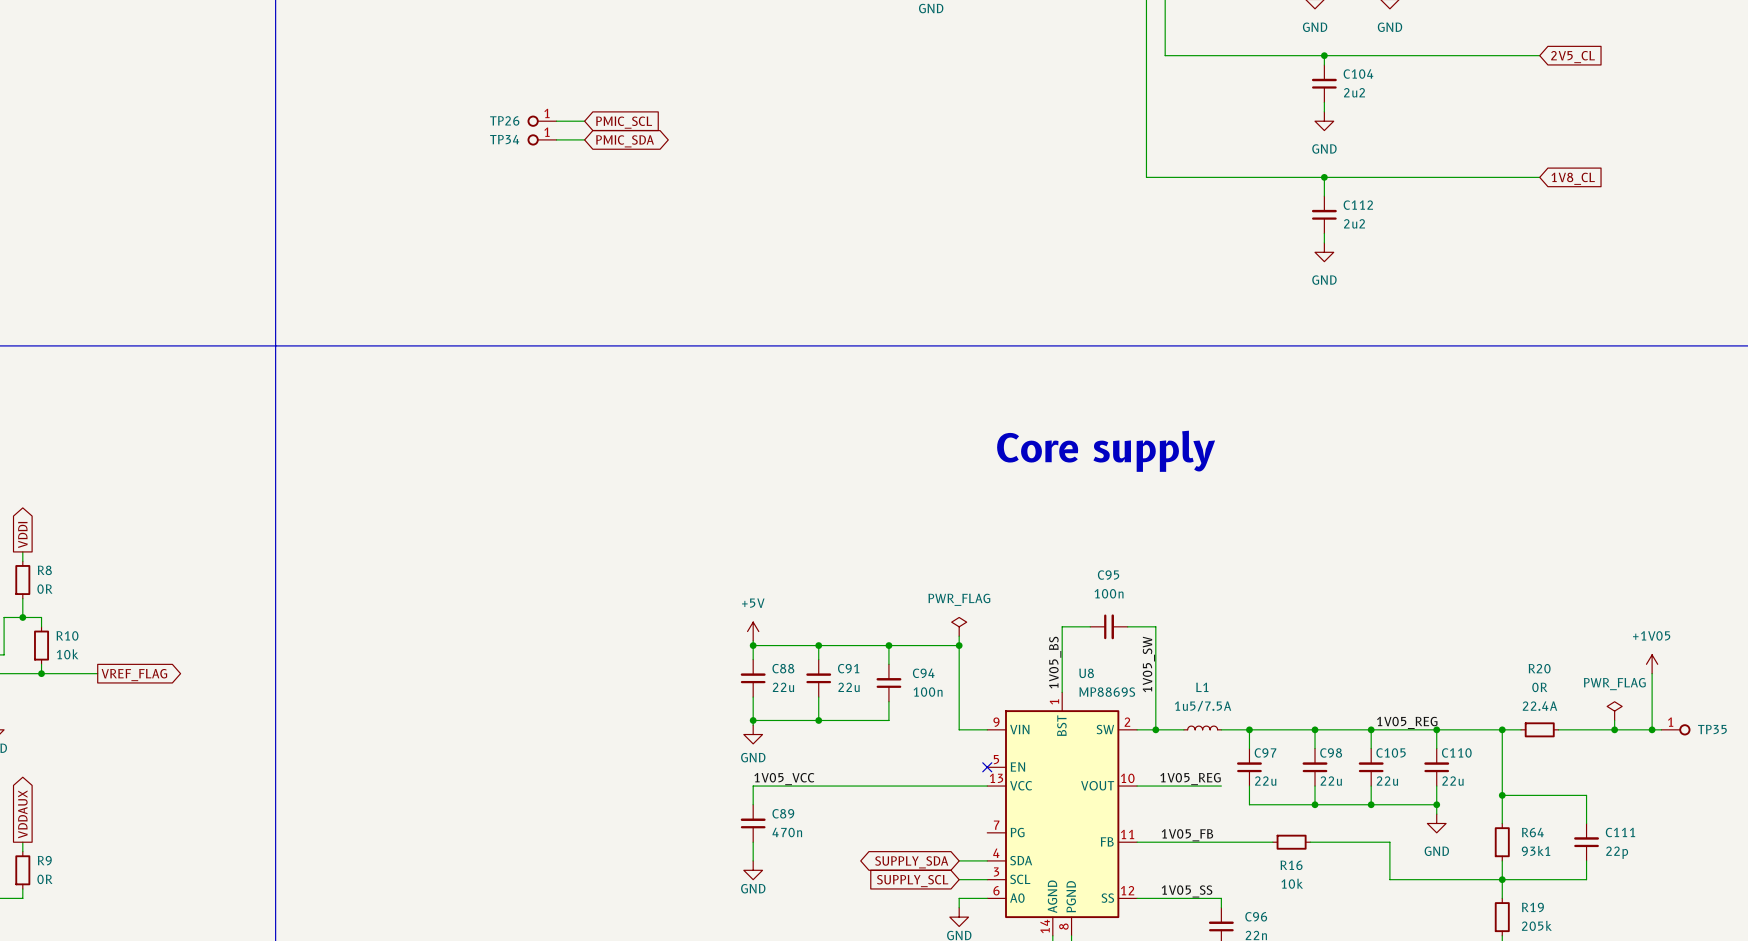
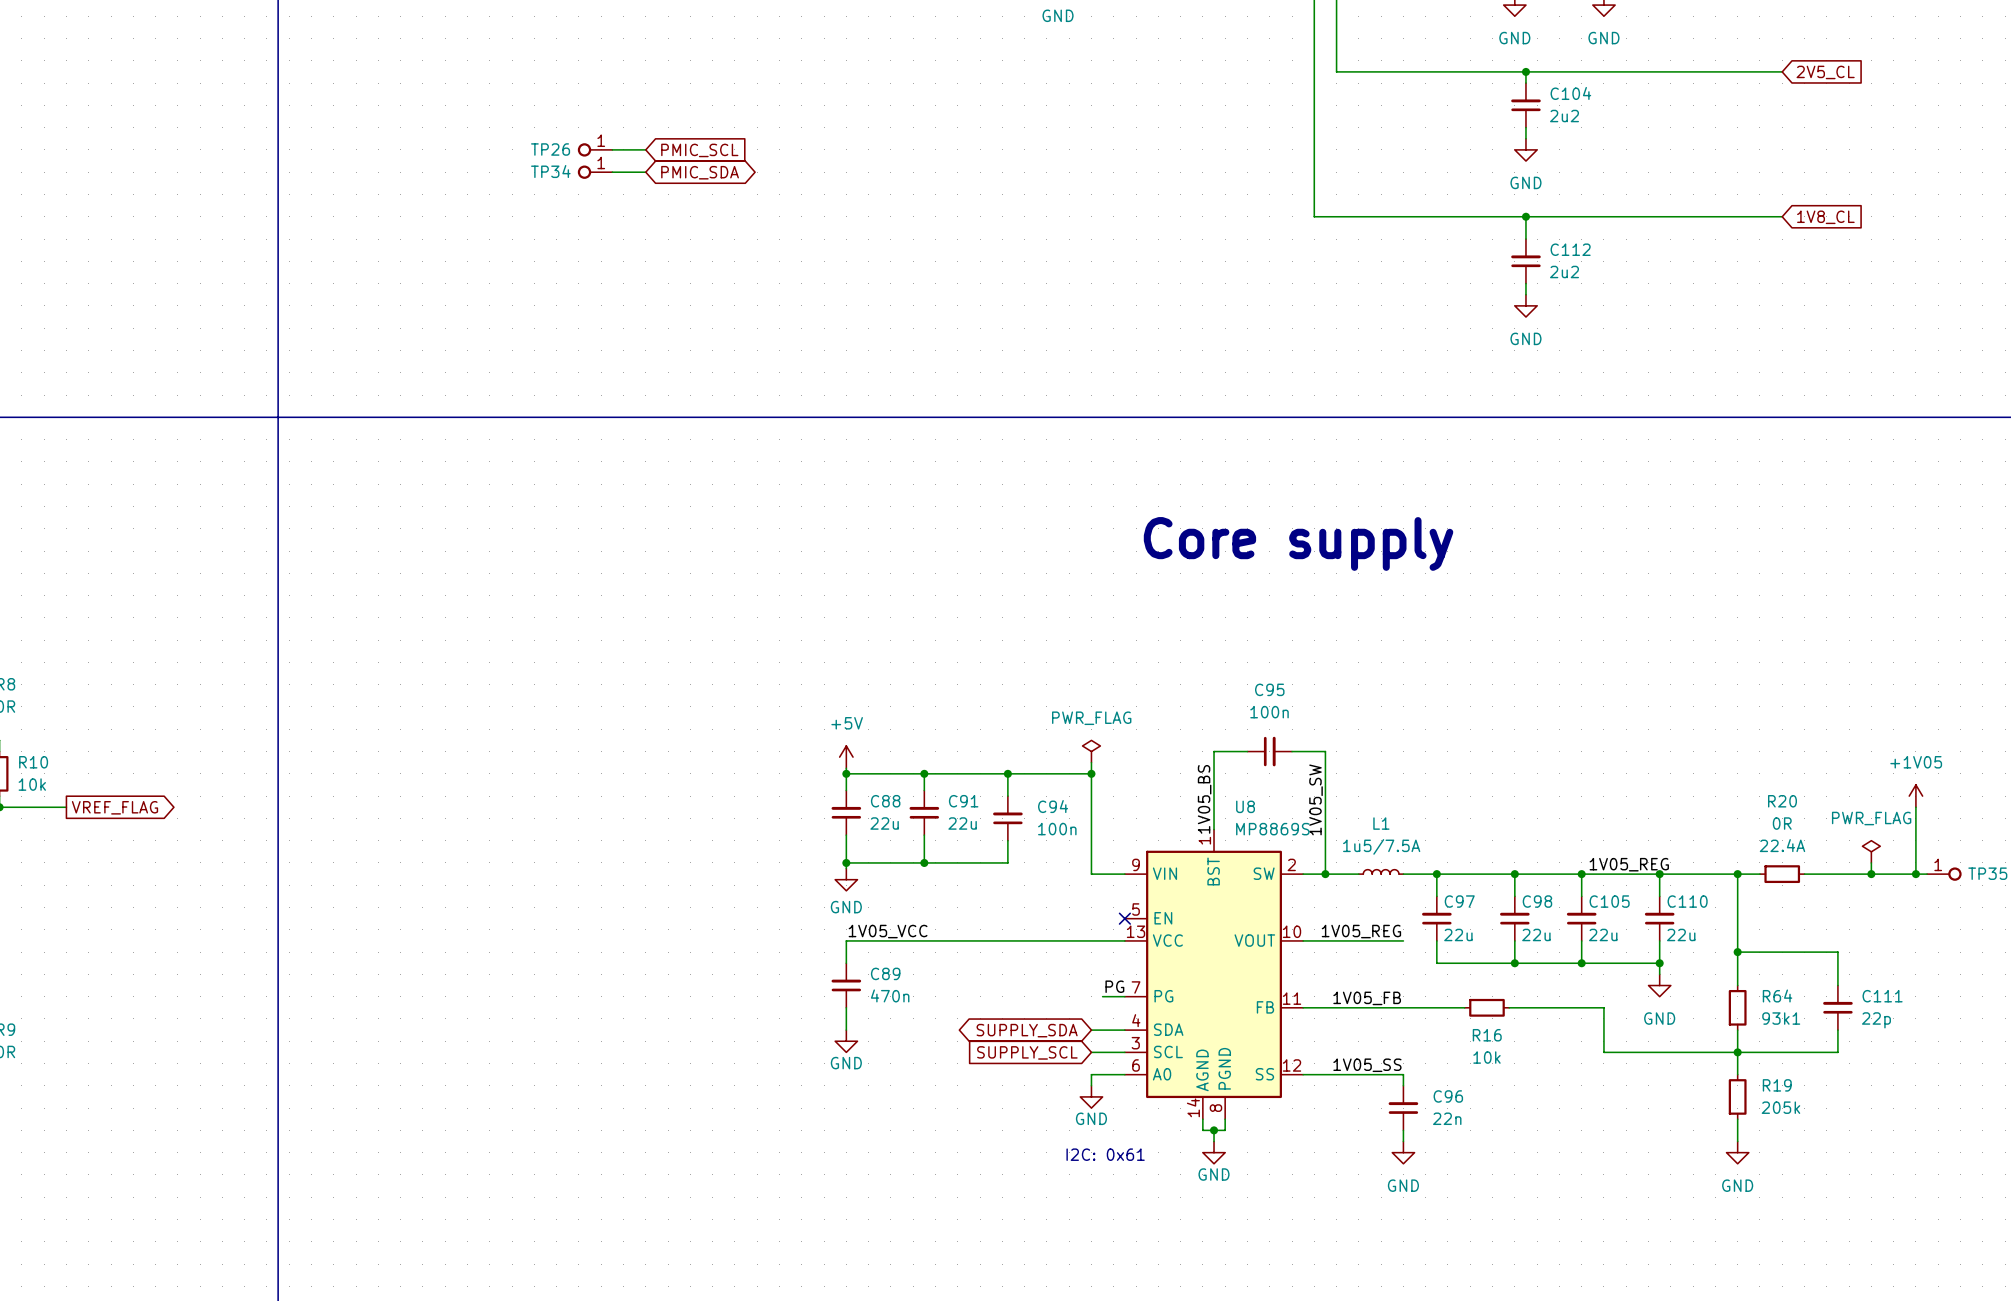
label: none -> PG (1114, 986)
wire: none -> (1102, 996) (1124, 996)

